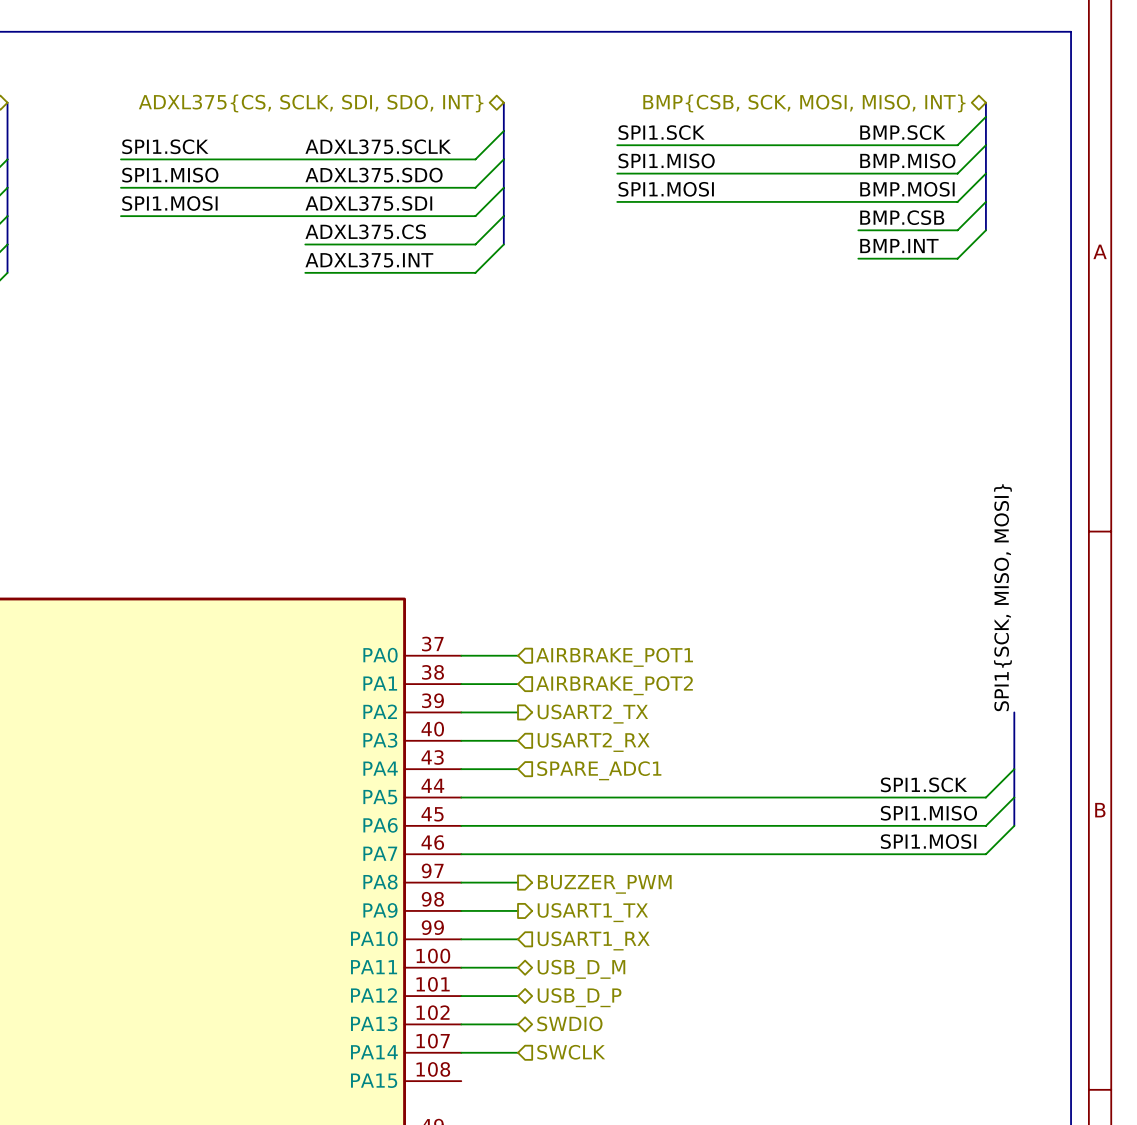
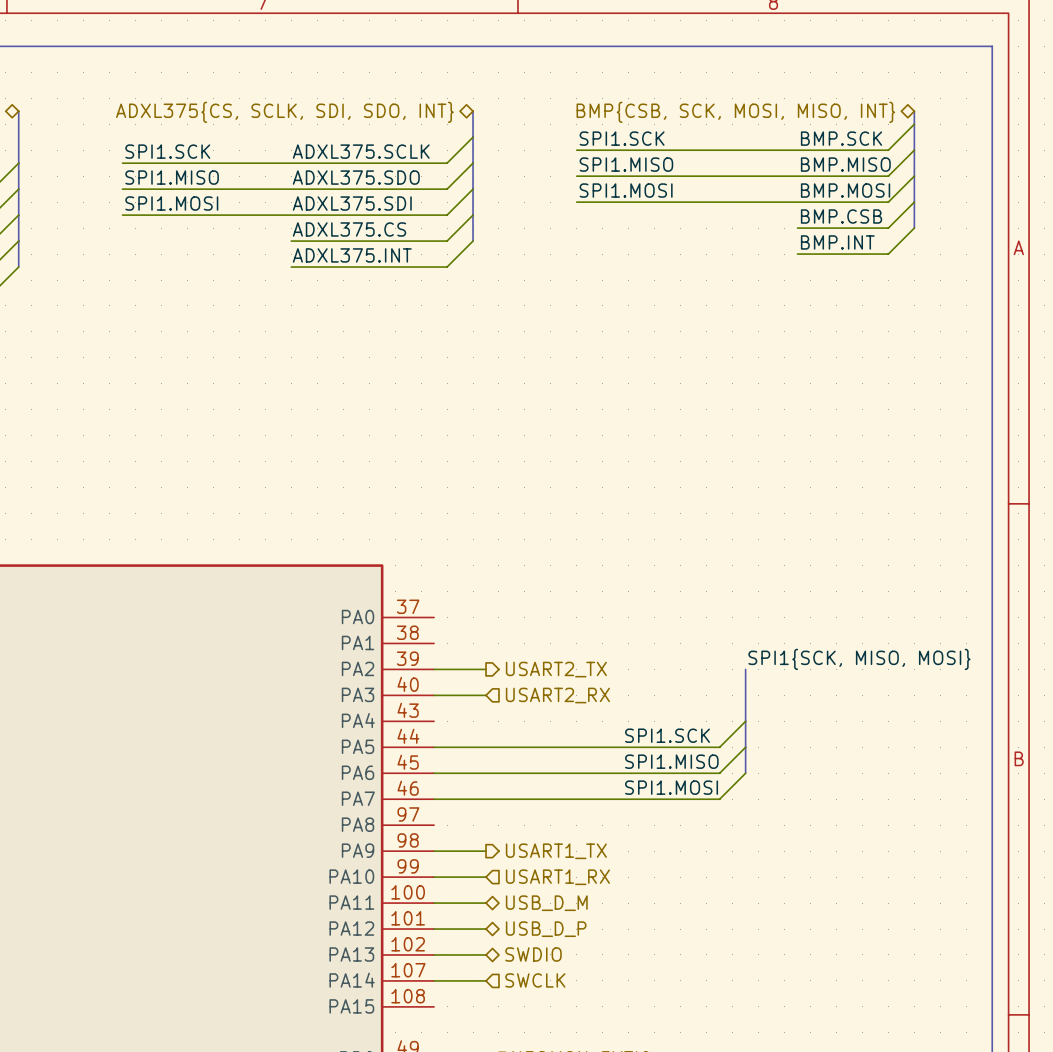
label rotation: 0° (1002, 597) -> 90° clockwise (859, 659)
wire: (461, 655) (518, 655) -> none
hierarchical label: AIRBRAKE_POT1 (614, 657) -> none
wire: (461, 684) (518, 684) -> none
hierarchical label: AIRBRAKE_POT2 (614, 685) -> none
bus: (1014, 712) (1014, 825) -> (745, 669) (745, 773)
wire: (461, 769) (518, 769) -> none
wire: (1014, 769) (985, 797) (773, 797) -> (745, 721) (719, 747)
hierarchical label: SPARE_ADC1 (599, 770) -> none
label position: SPI1.SCK (923, 784) -> SPI1.SCK (667, 735)
wire: (1014, 797) (985, 825) (773, 825) -> (745, 747) (719, 773)
label position: SPI1.MISO (928, 813) -> SPI1.MISO (671, 761)
wire: (1014, 825) (985, 854) (773, 854) -> (745, 773) (719, 799)
label position: SPI1.MOSI (928, 841) -> SPI1.MOSI (671, 787)
wire: (461, 882) (518, 882) -> none
hierarchical label: BUZZER_PWM (604, 884) -> none

